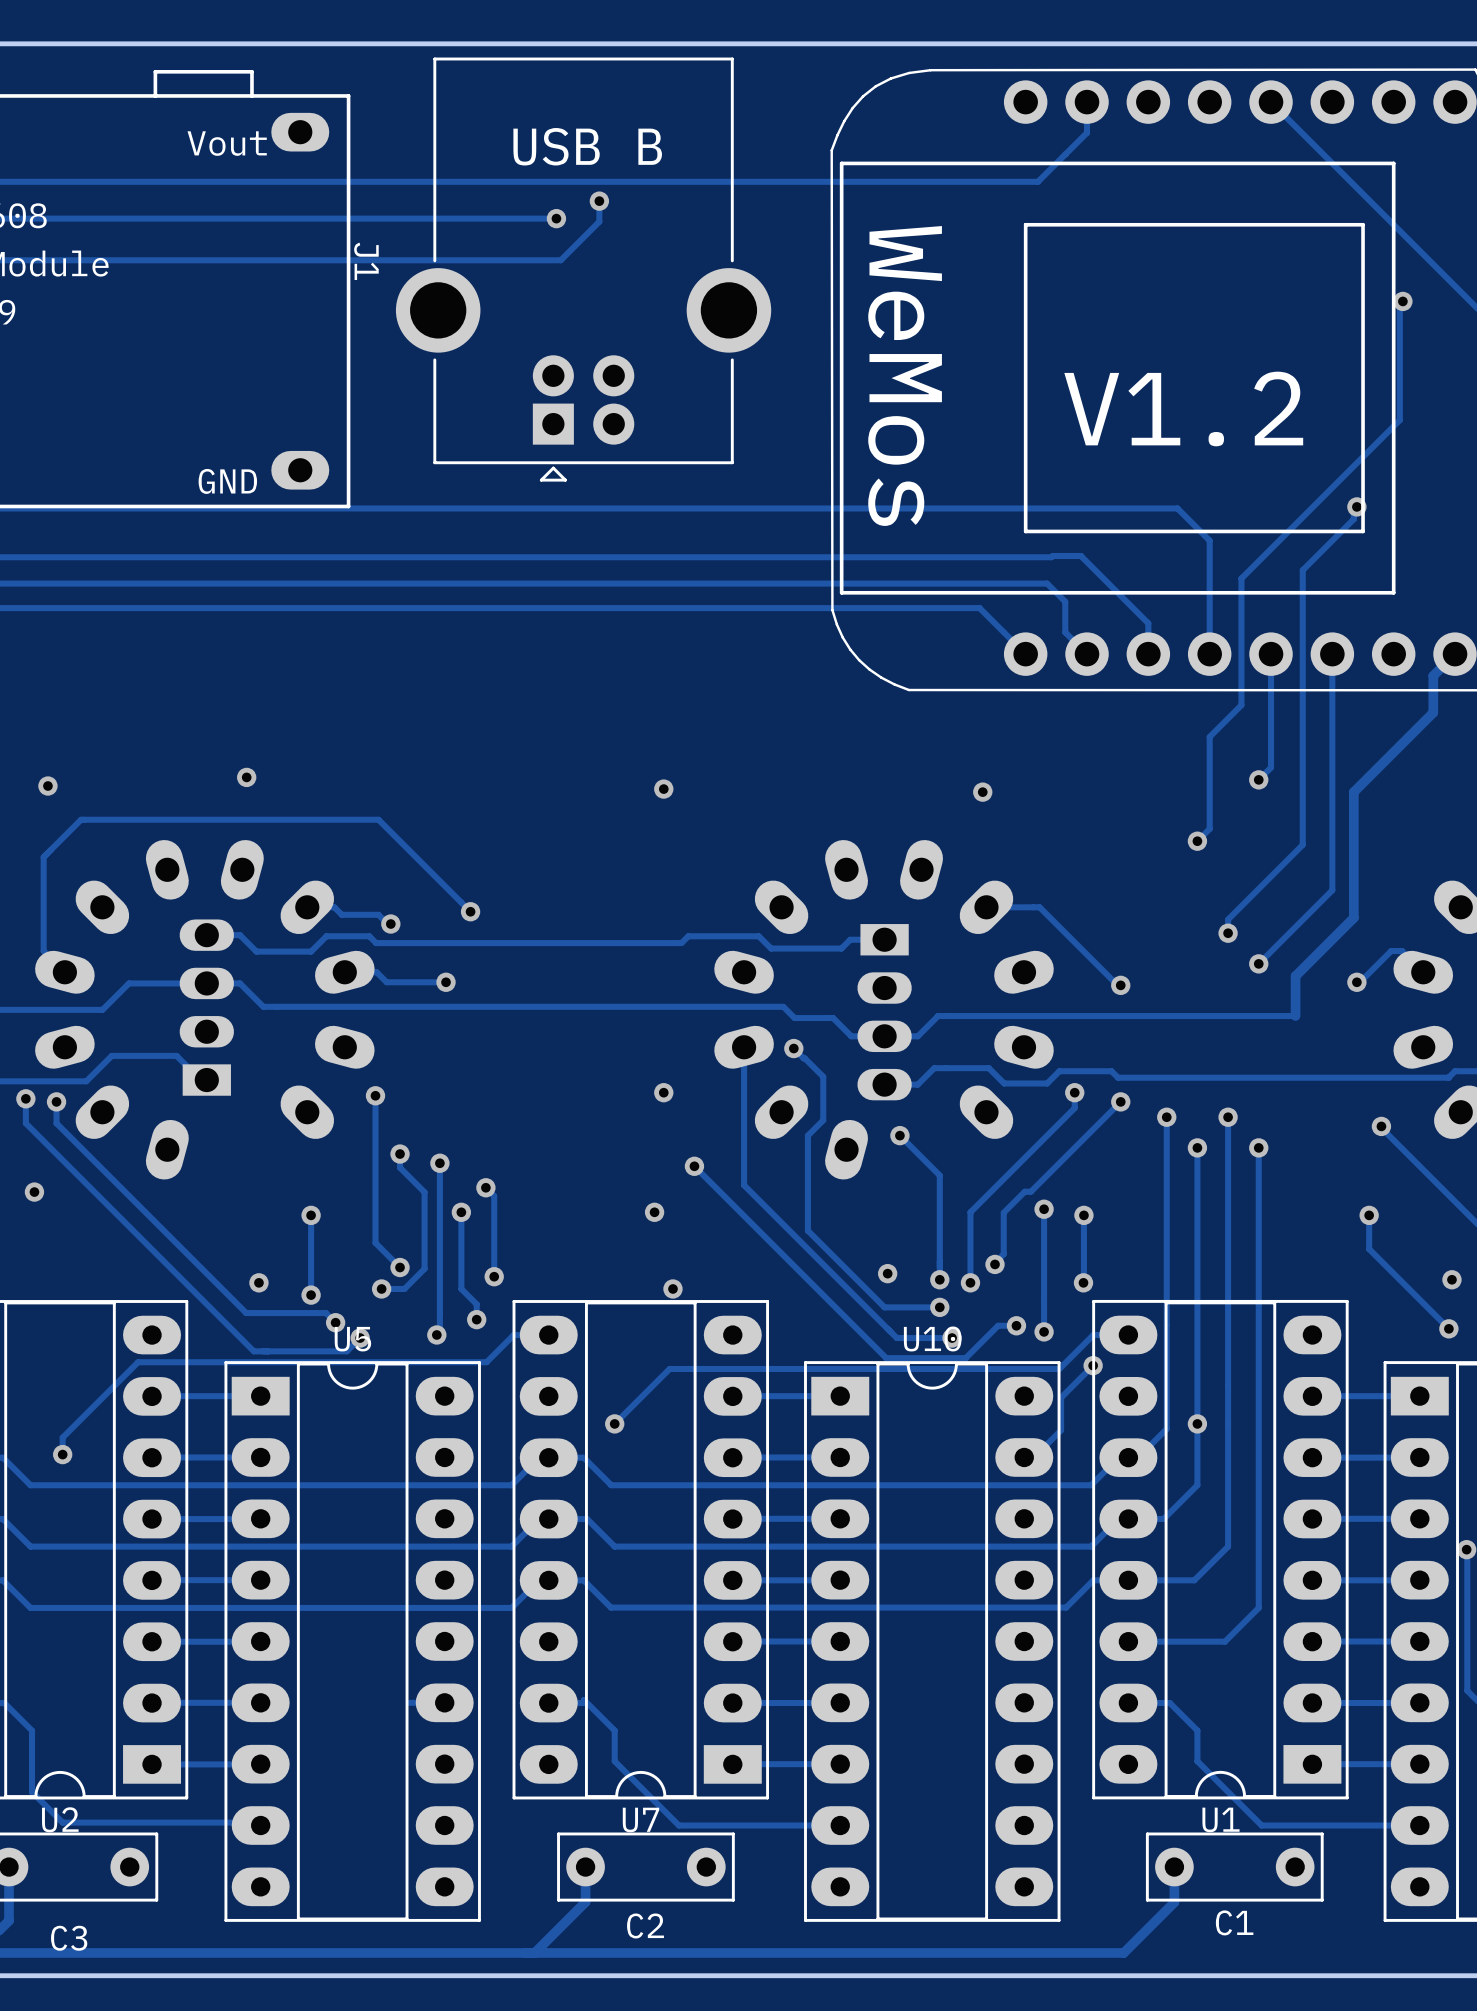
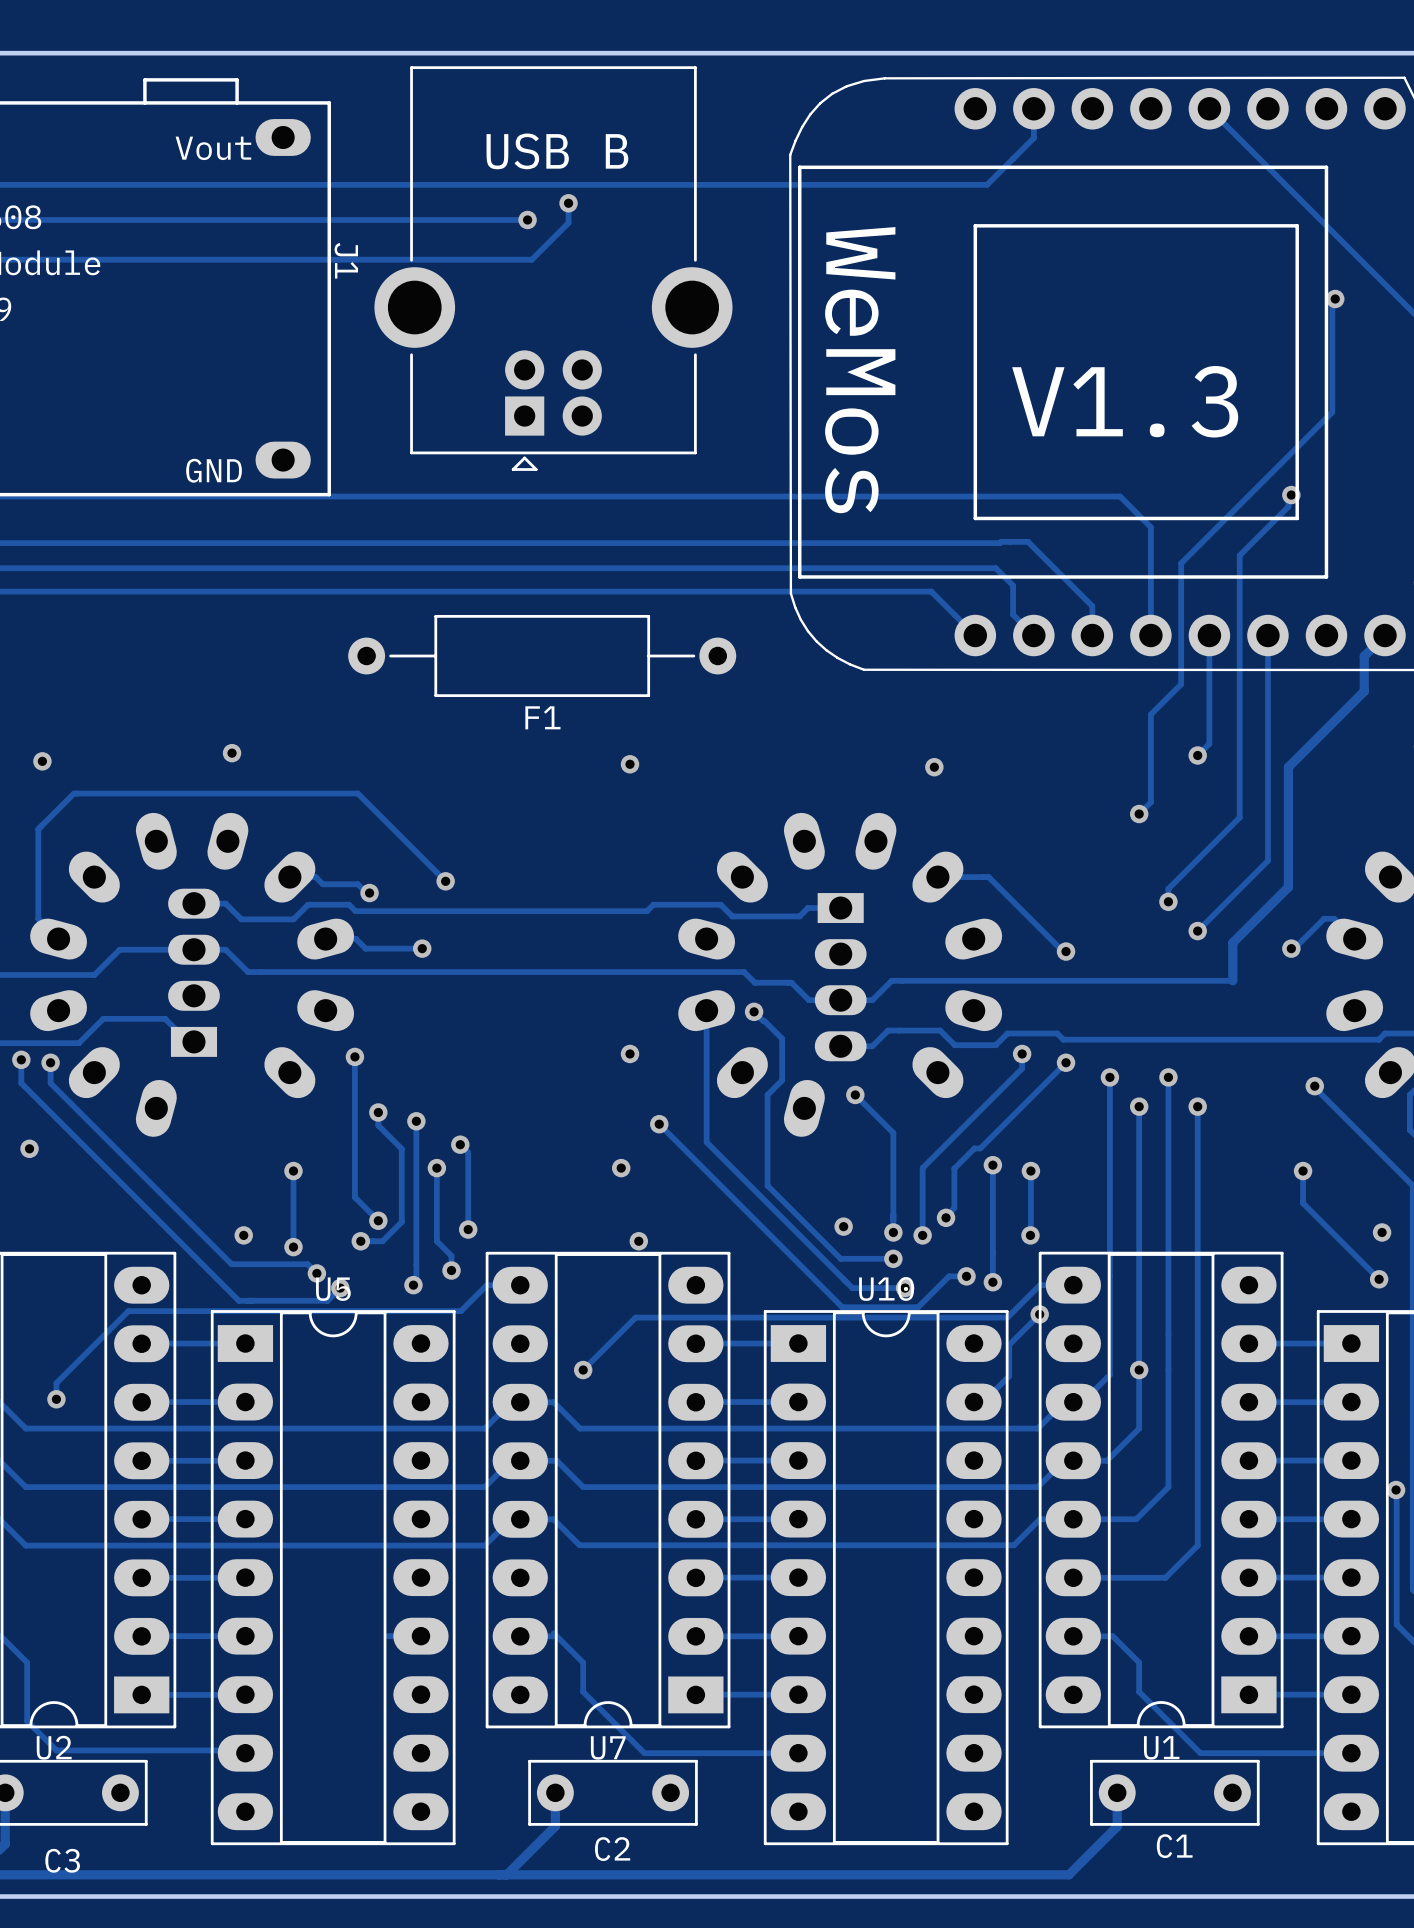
text: V1.2 (1183, 408) -> V1.3 (1125, 401)
F1: none -> (542, 656)

